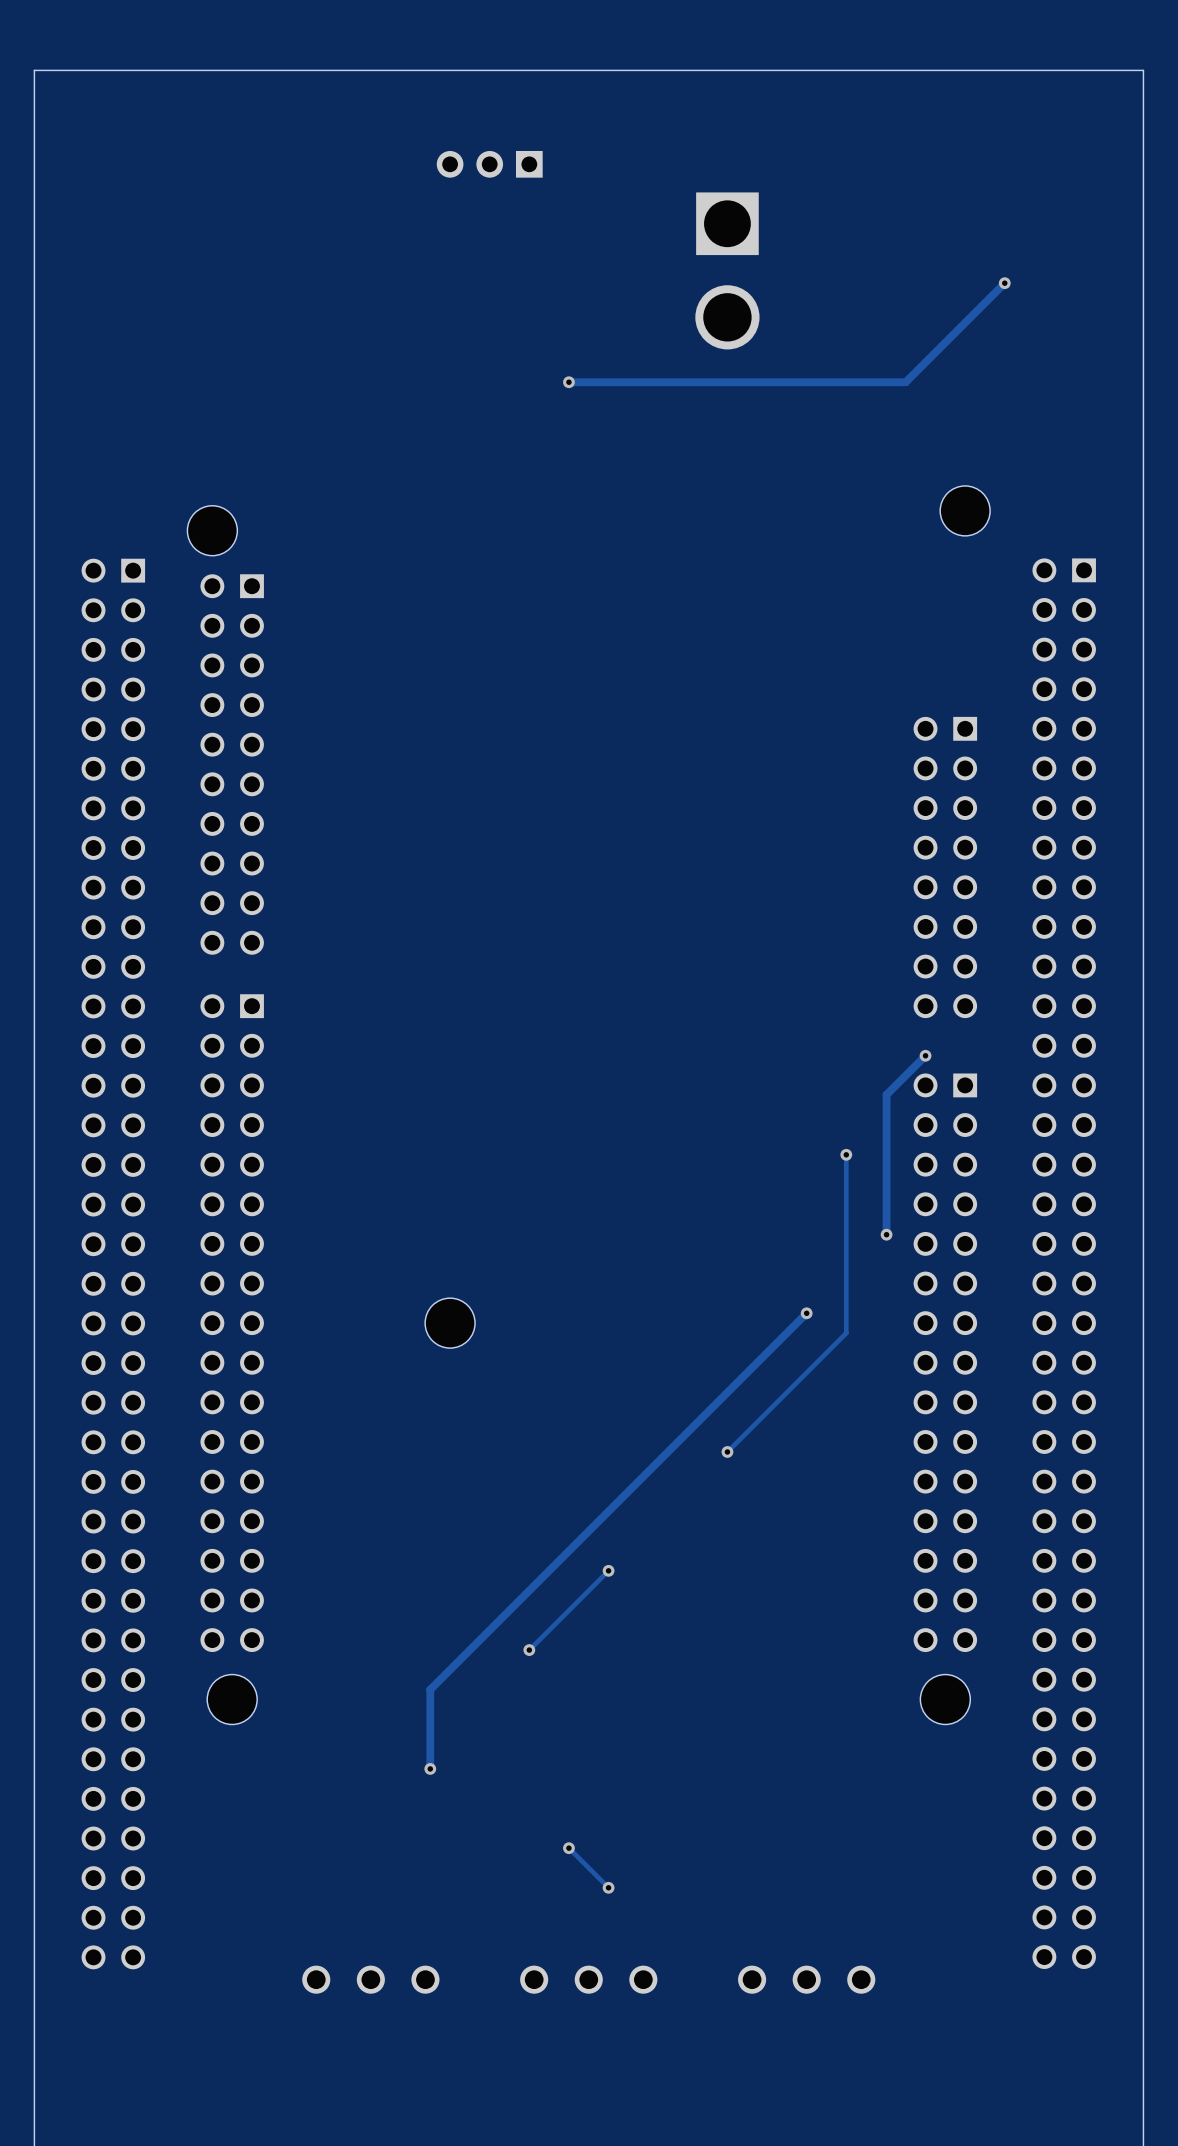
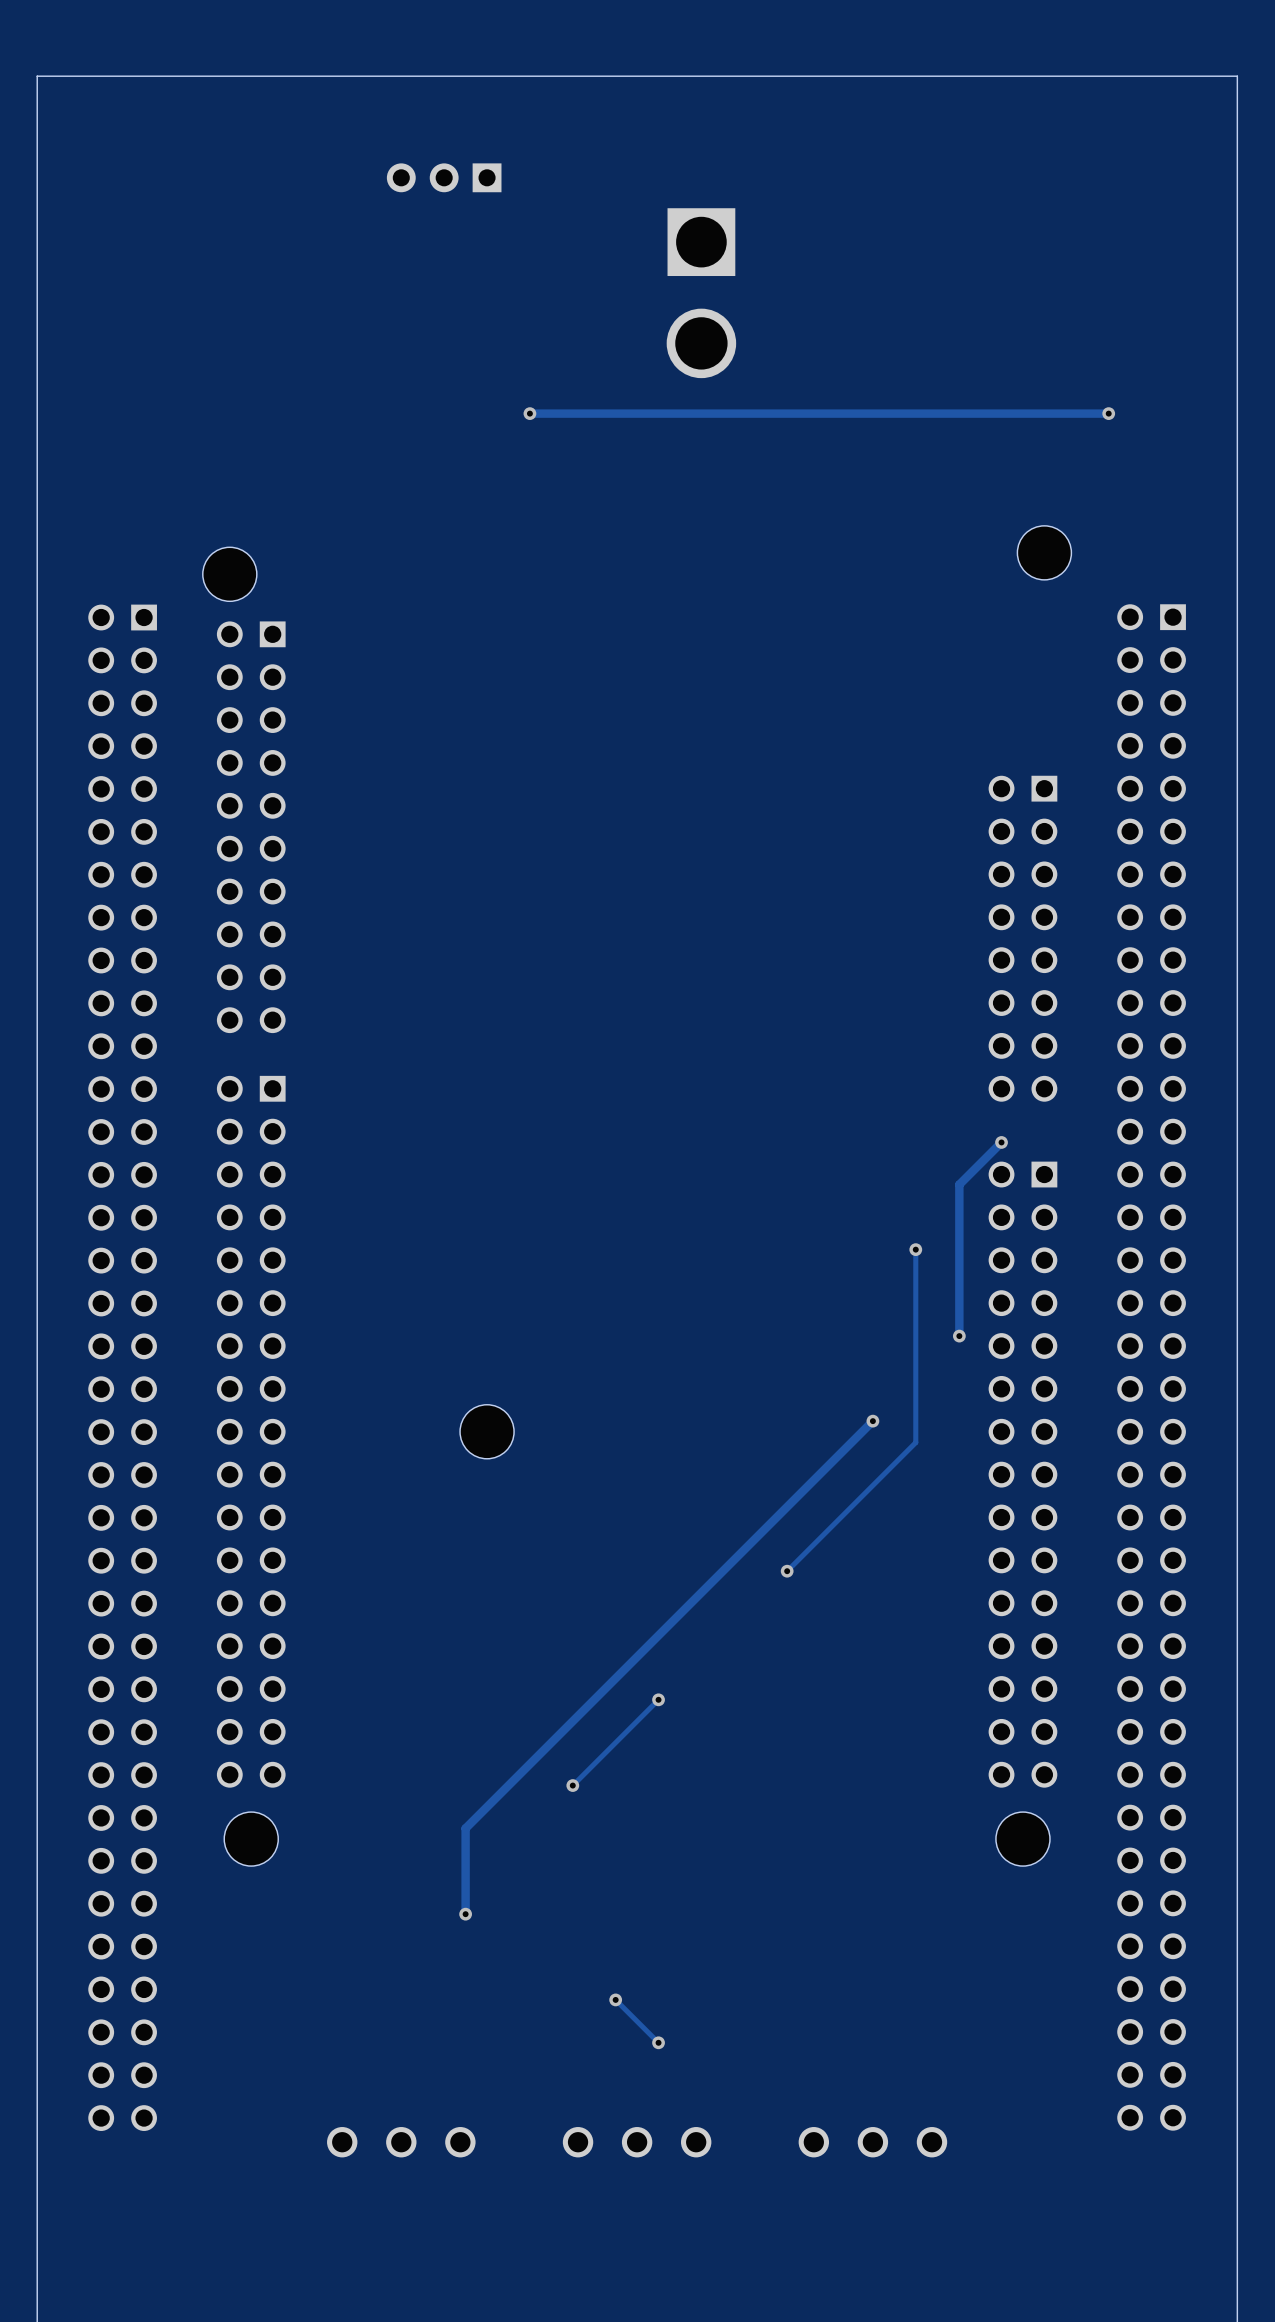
part position: (489, 164) -> (444, 177)
part position: (727, 270) -> (701, 293)
track: (1004, 283) (905, 382) -> (1108, 413) (980, 413)
via: (1004, 283) -> none
track: none -> (615, 413) (529, 413)
via position: (568, 382) -> (529, 413)
via: none -> (1108, 413)

